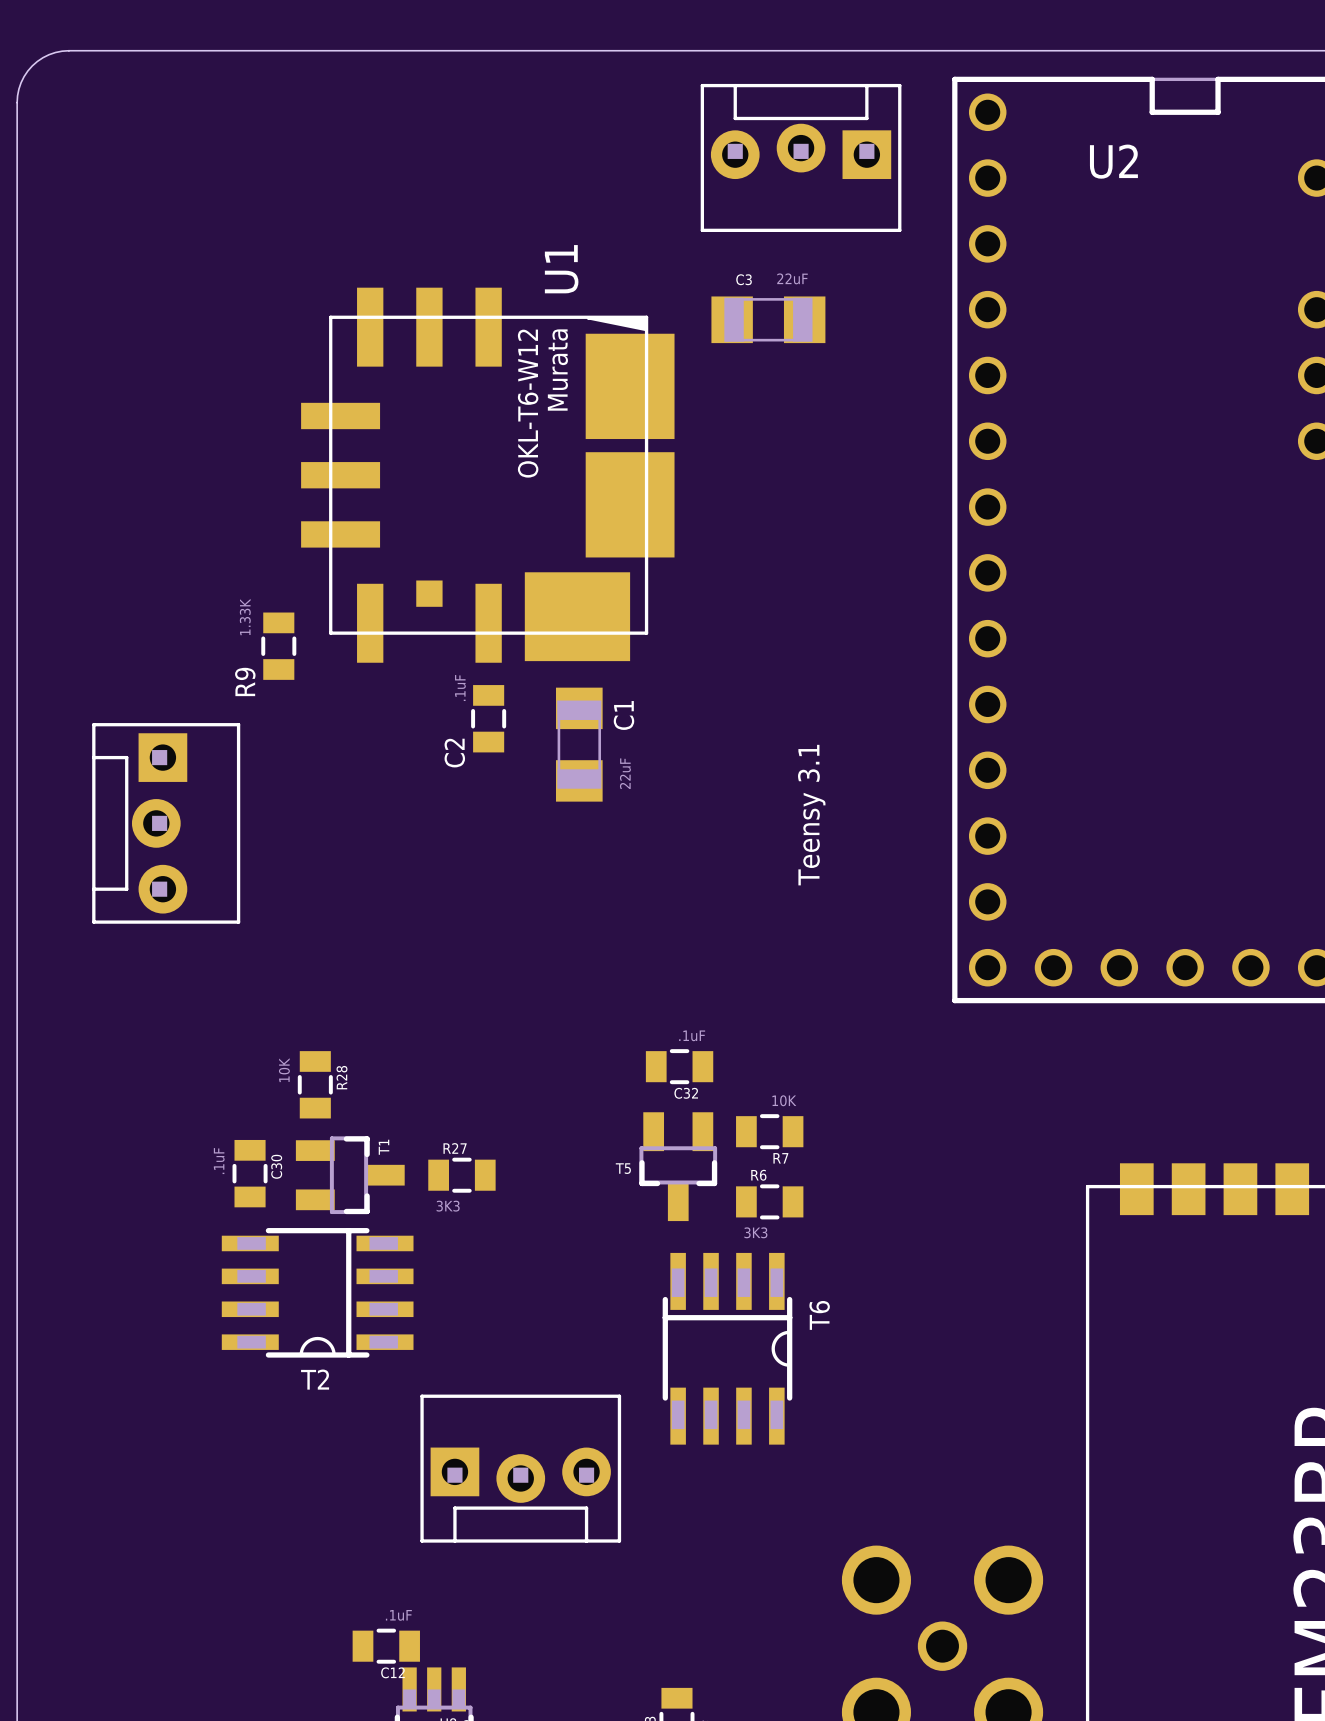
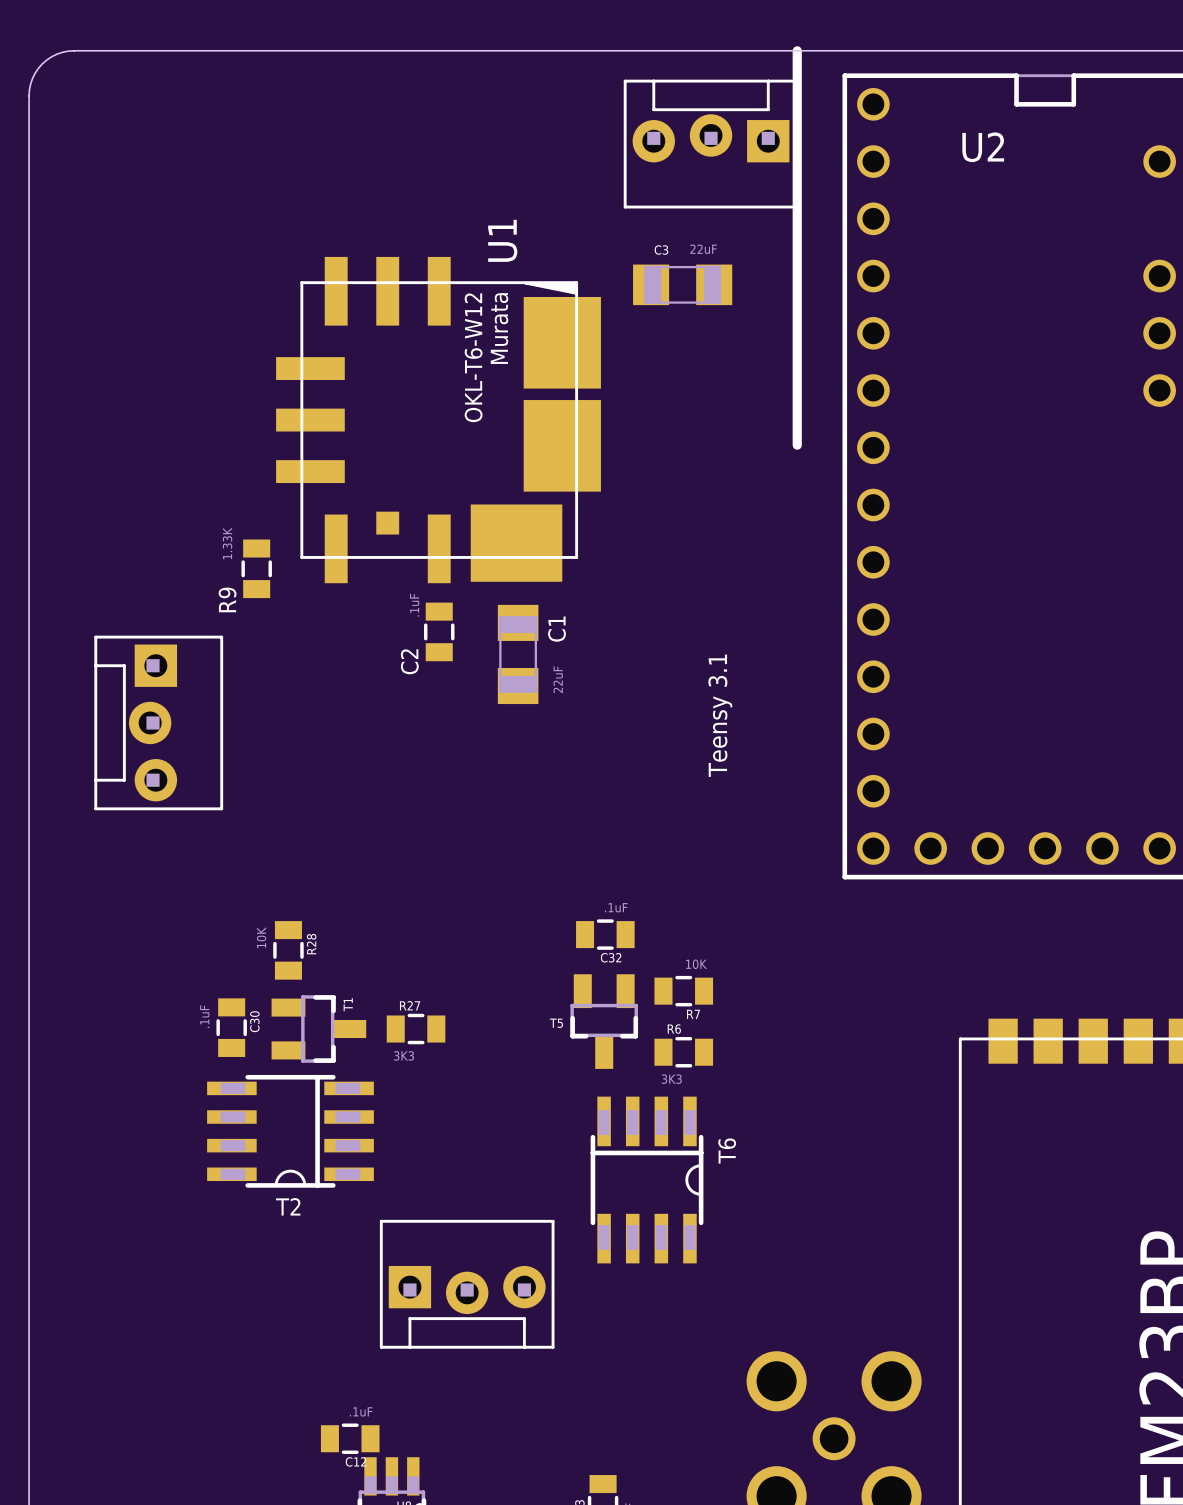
line: none -> (797, 50) (797, 445)

